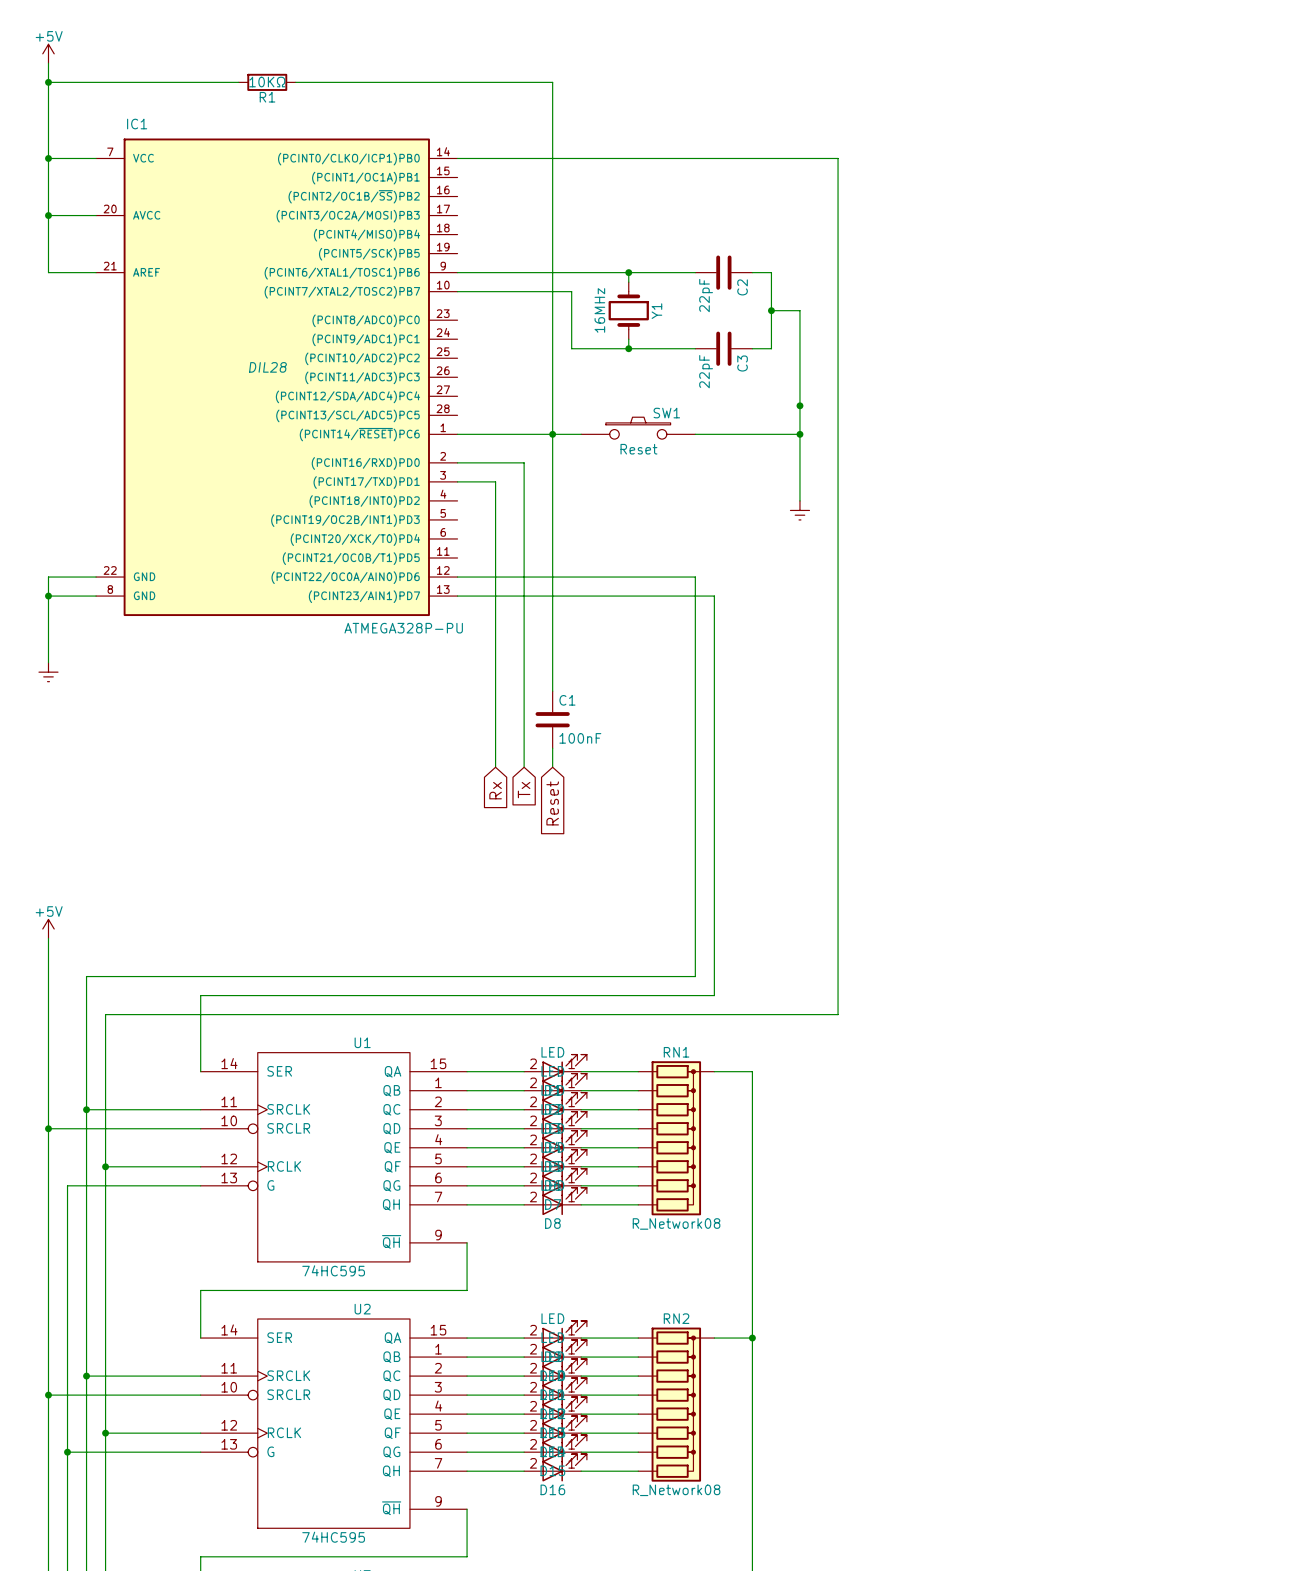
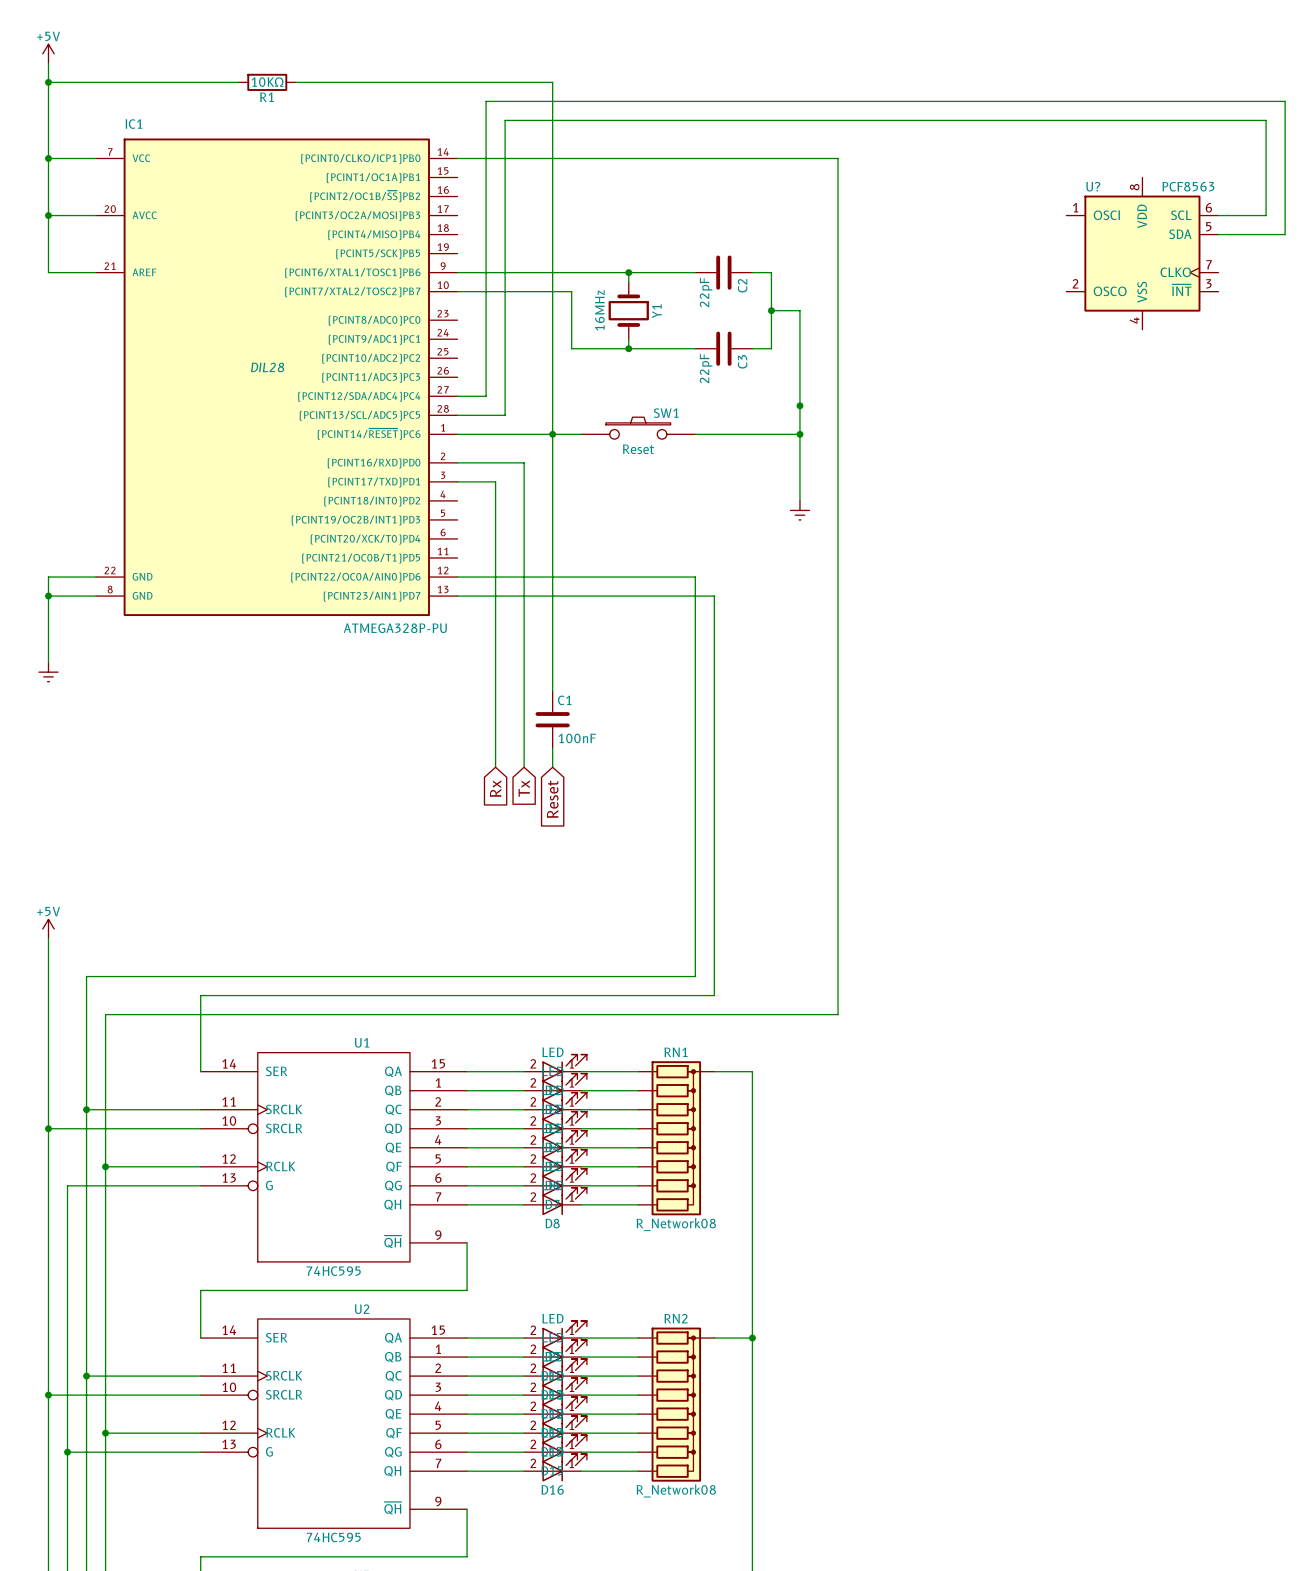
wire: none -> (1218, 215) (1266, 215) (1266, 120) (505, 120) (505, 415) (457, 415)
wire: none -> (1218, 234) (1285, 234) (1285, 101) (486, 101) (486, 396) (457, 396)
U?: none -> PCF8563 (1142, 253)

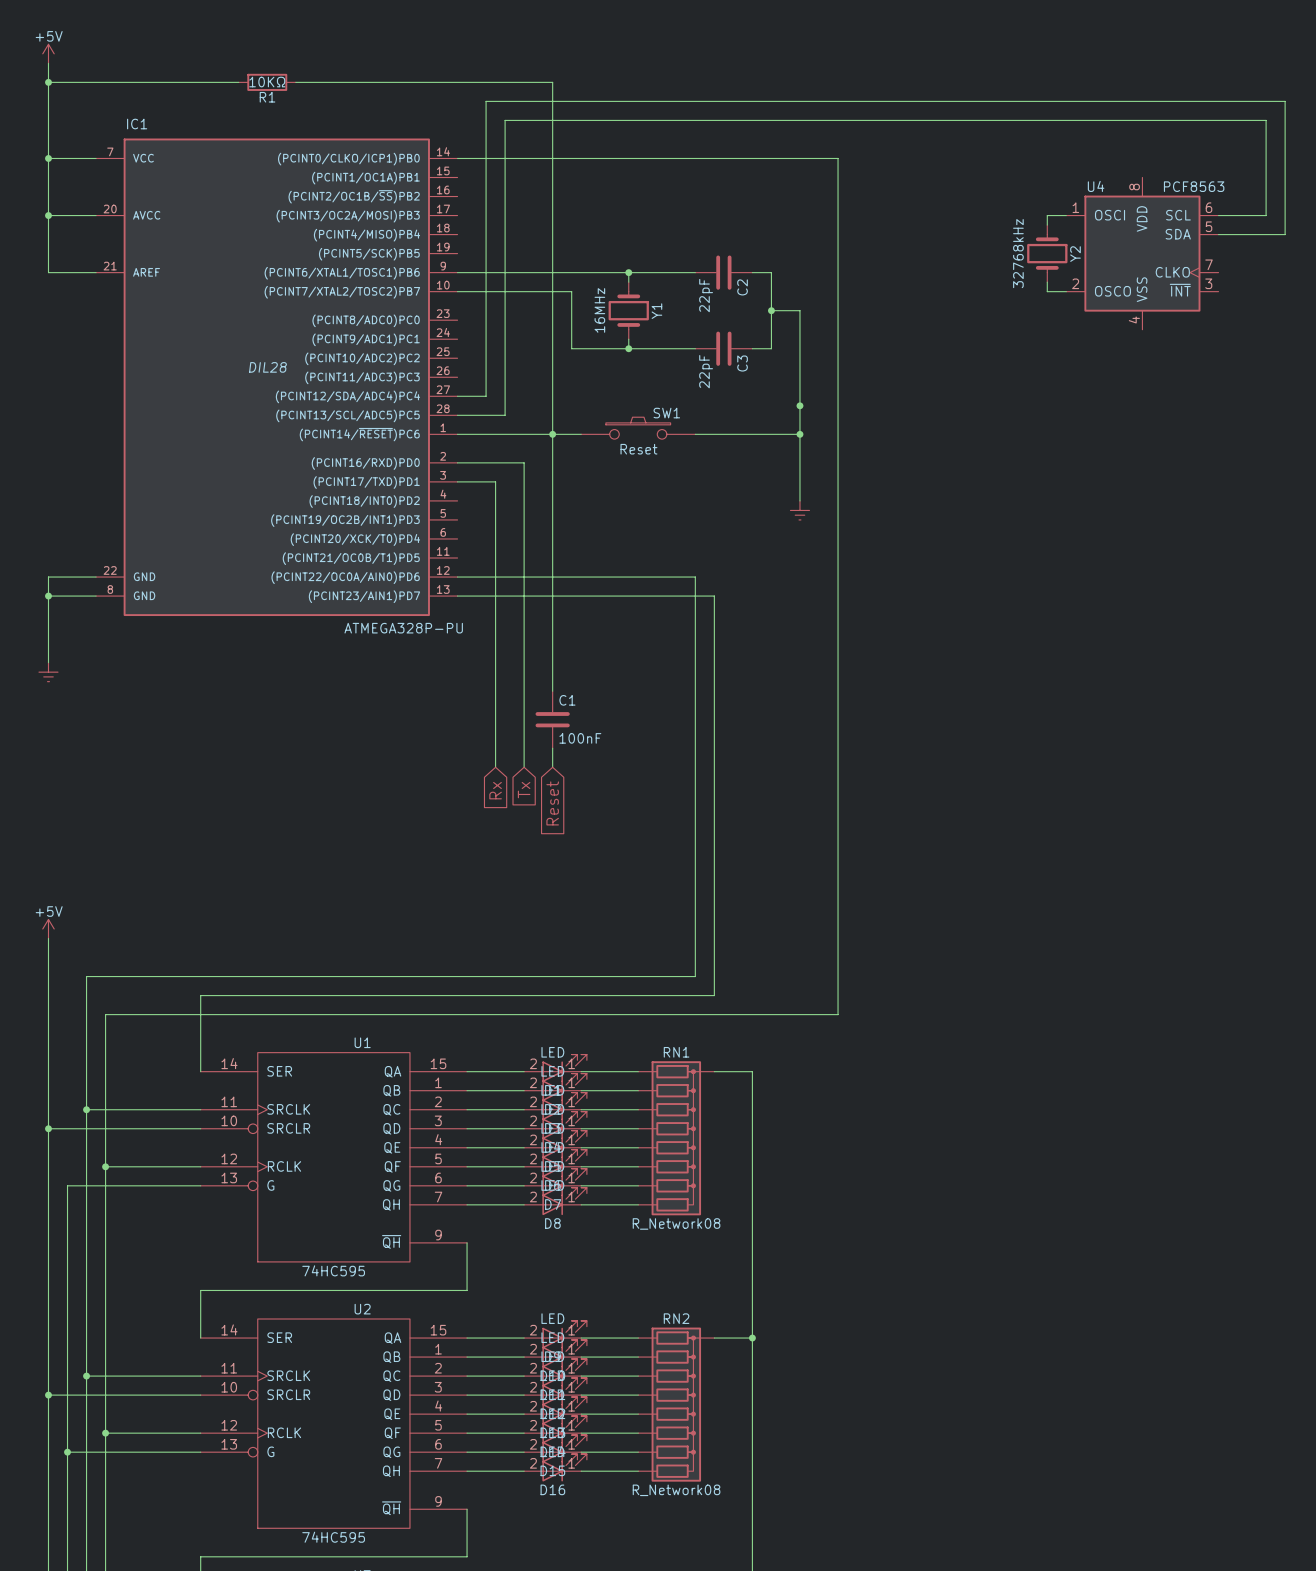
U? name: U? (1093, 186) -> U4 (1096, 186)
wire: none -> (1066, 215) (1047, 215) (1047, 225)
Y2: none -> 32768kHz (1047, 253)
wire: none -> (1047, 282) (1047, 291) (1066, 291)

